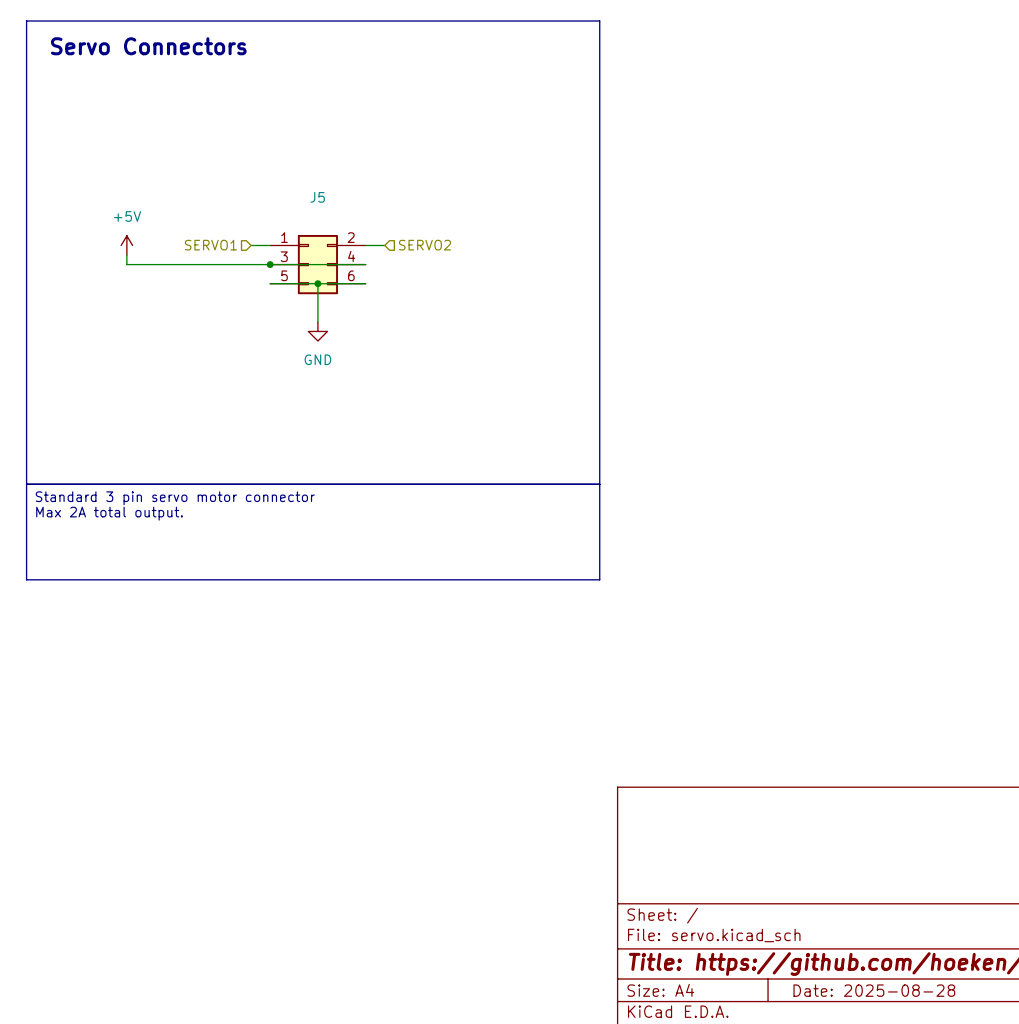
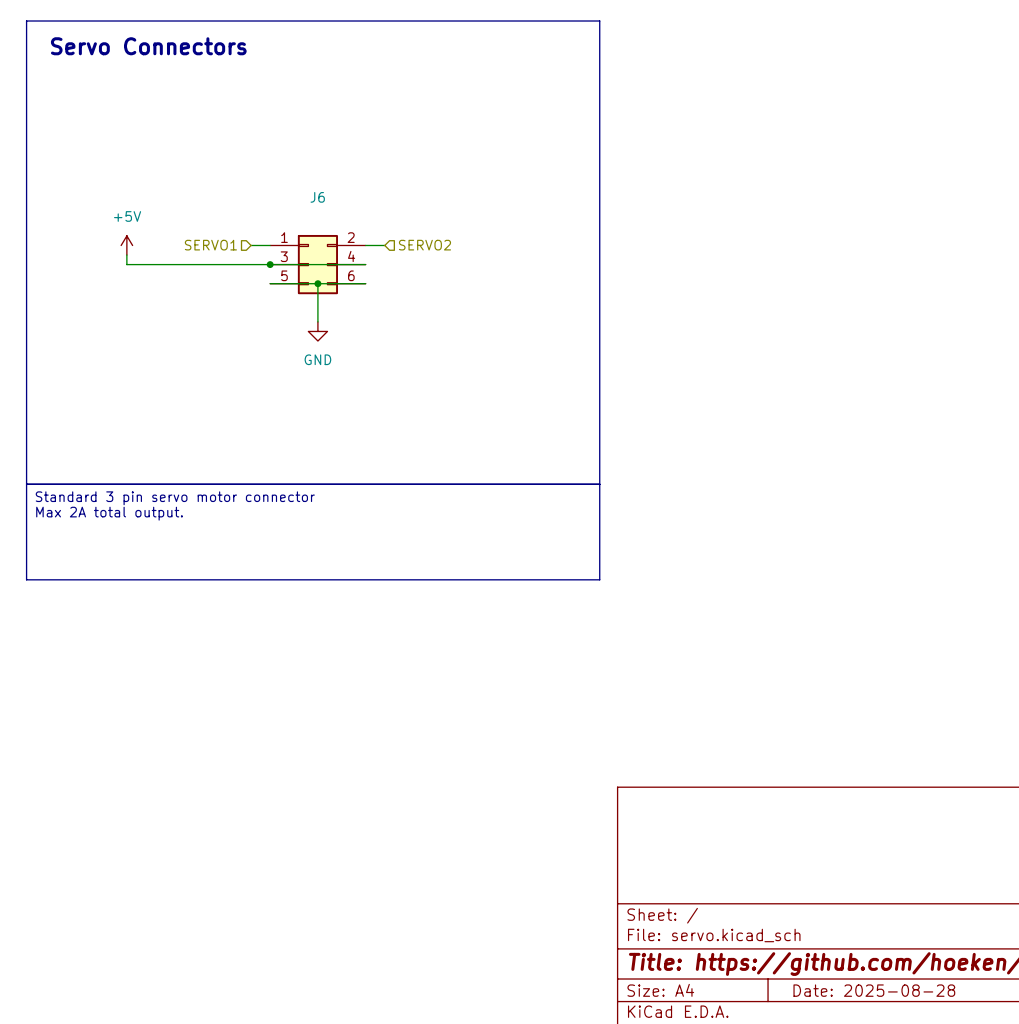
J5 name: J5 (317, 197) -> J6 (317, 197)

